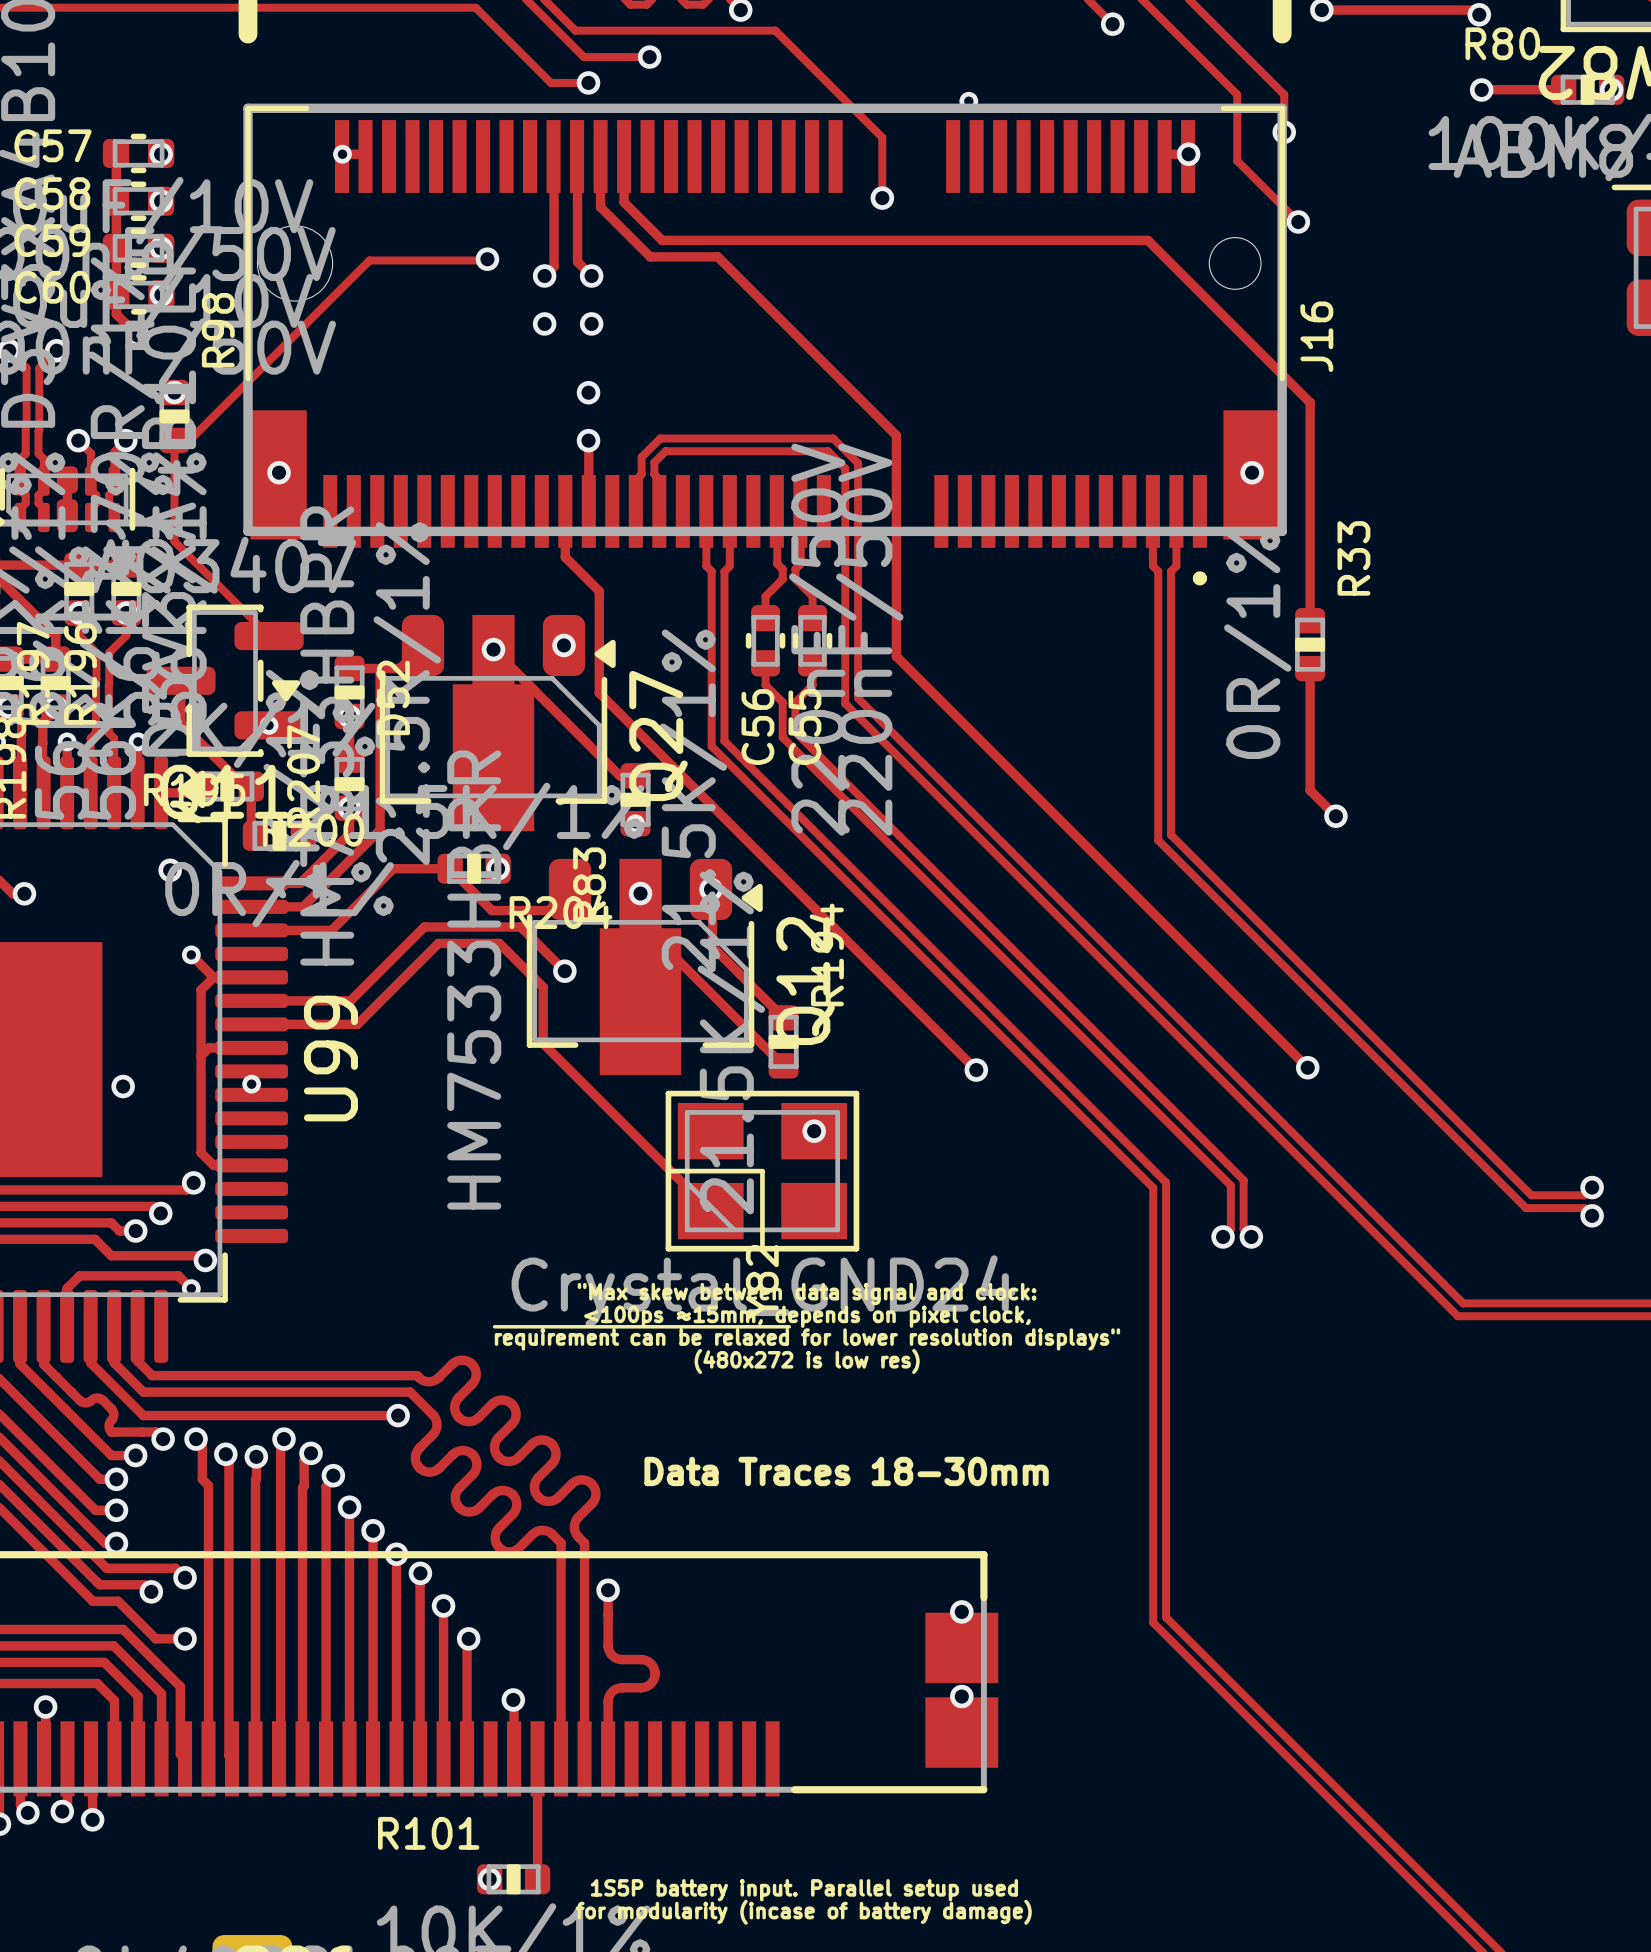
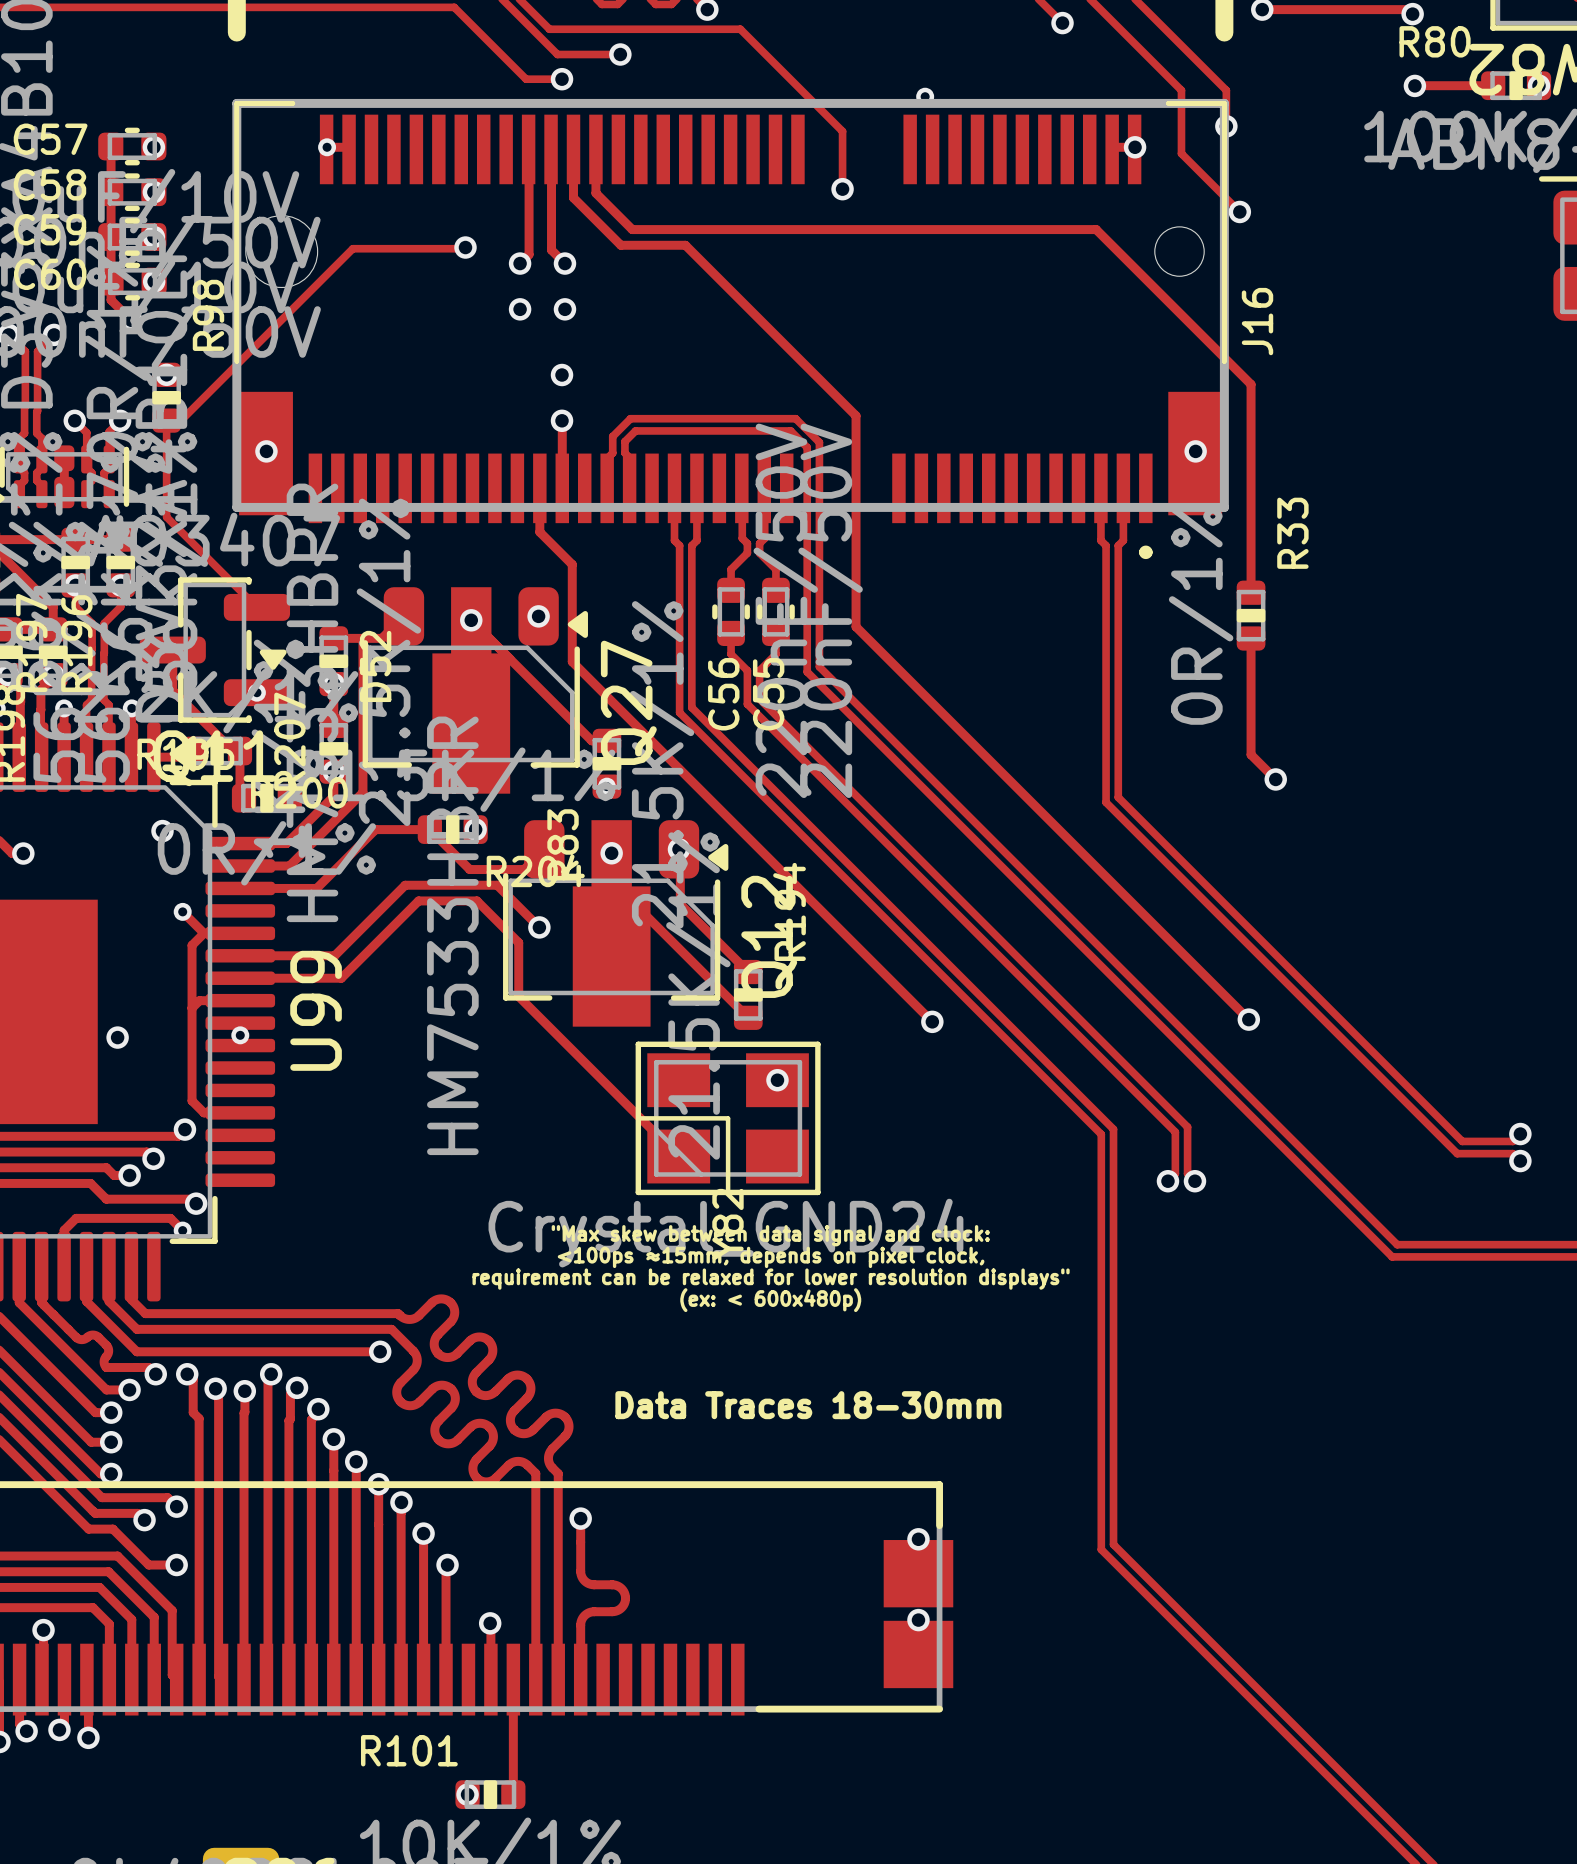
text: ~{requirement can be relaxed} for lower resolution displays" (806, 1337) -> requirement can be relaxed for lower resolution displays" (771, 1279)
text: (480x272 is low res) (807, 1361) -> (ex: < 600x480p) (770, 1300)
text: 1S5P battery input. Parallel setup used (804, 1890) -> none
text: for modularity (incase of battery damage) (803, 1912) -> none

